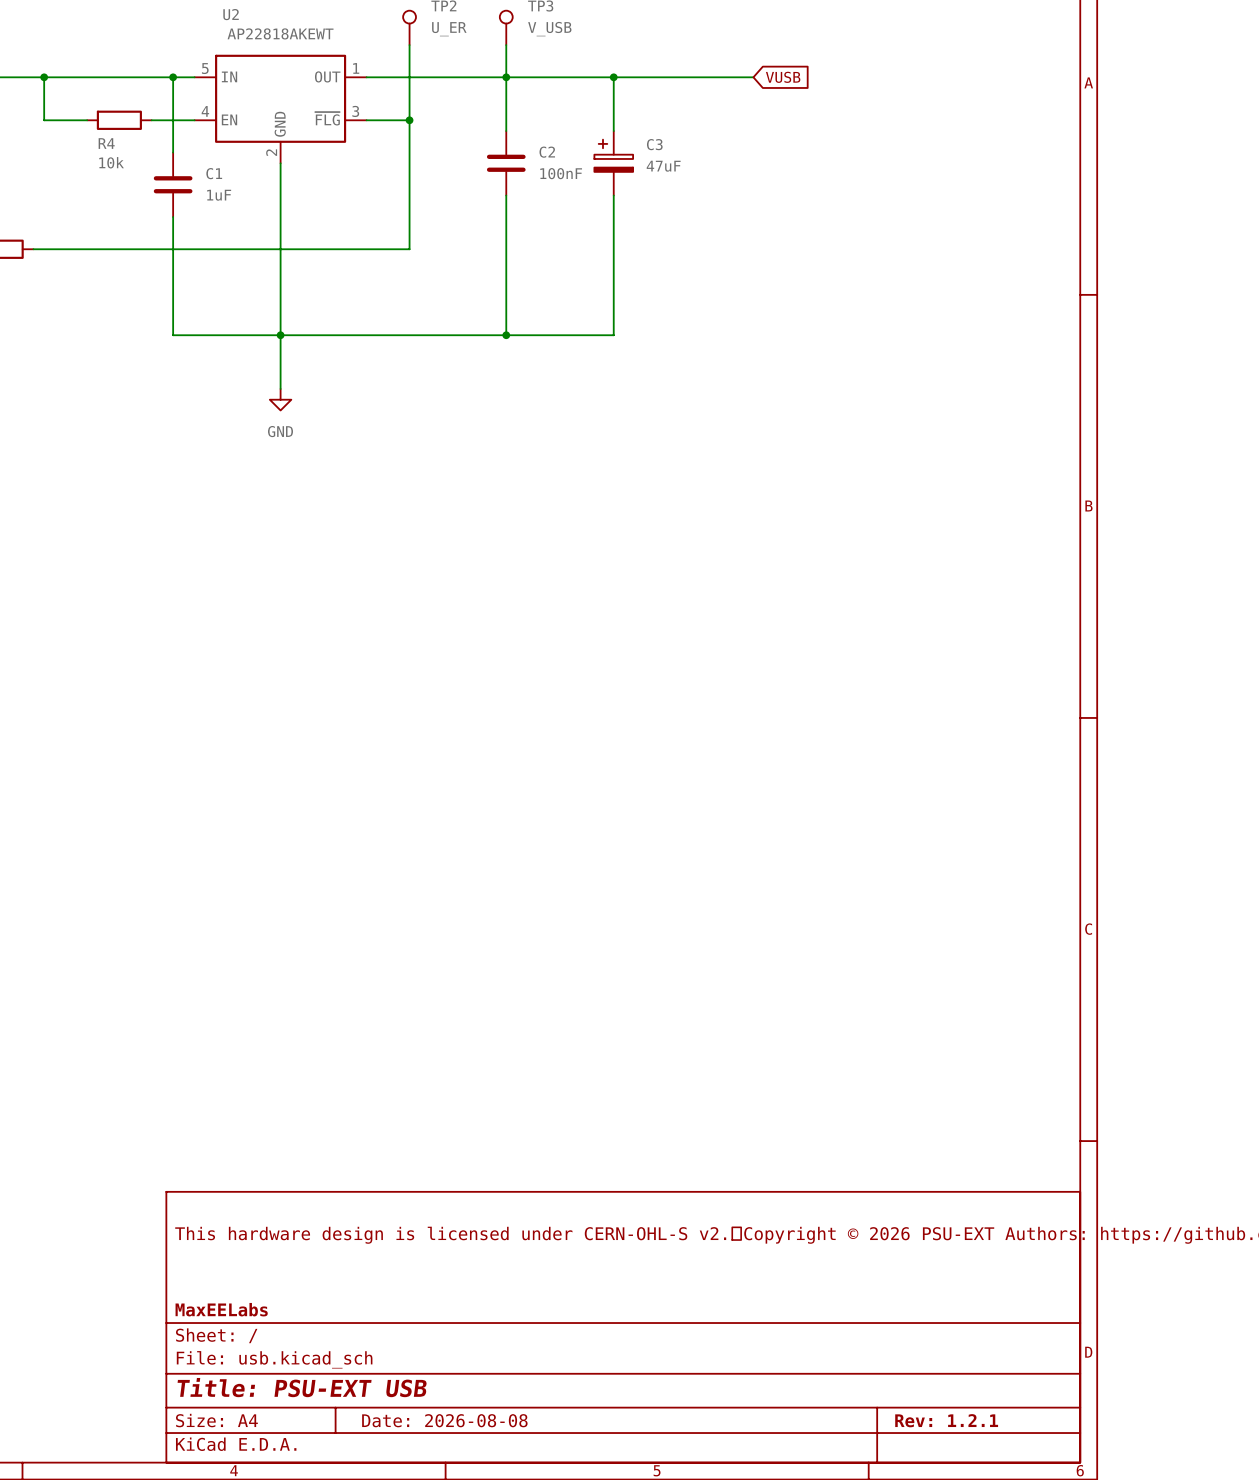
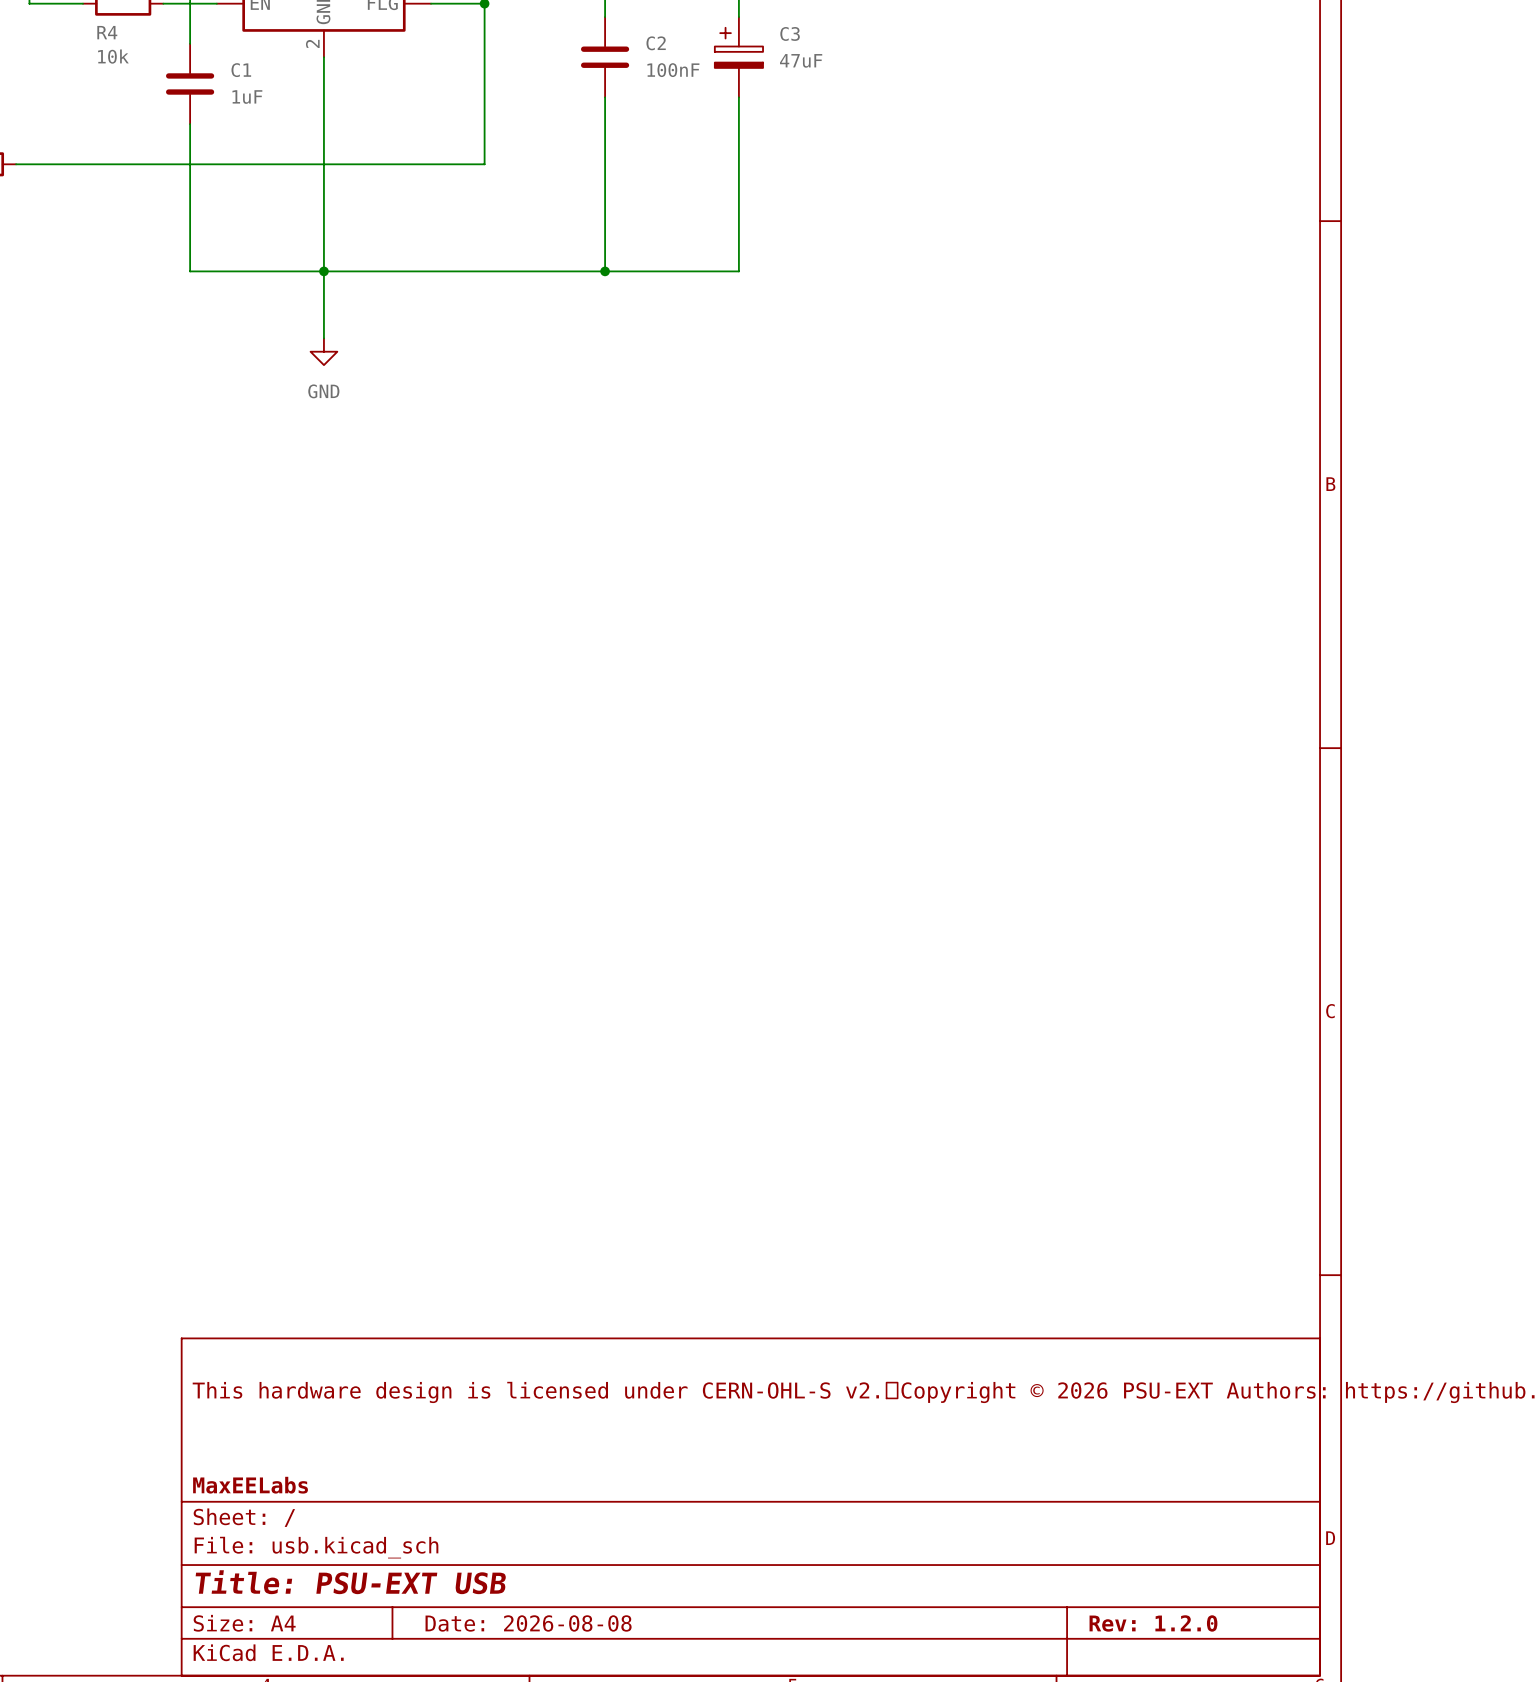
title block: Rev: 1.2.1 (946, 1420) -> Rev: 1.2.0 (1153, 1623)

